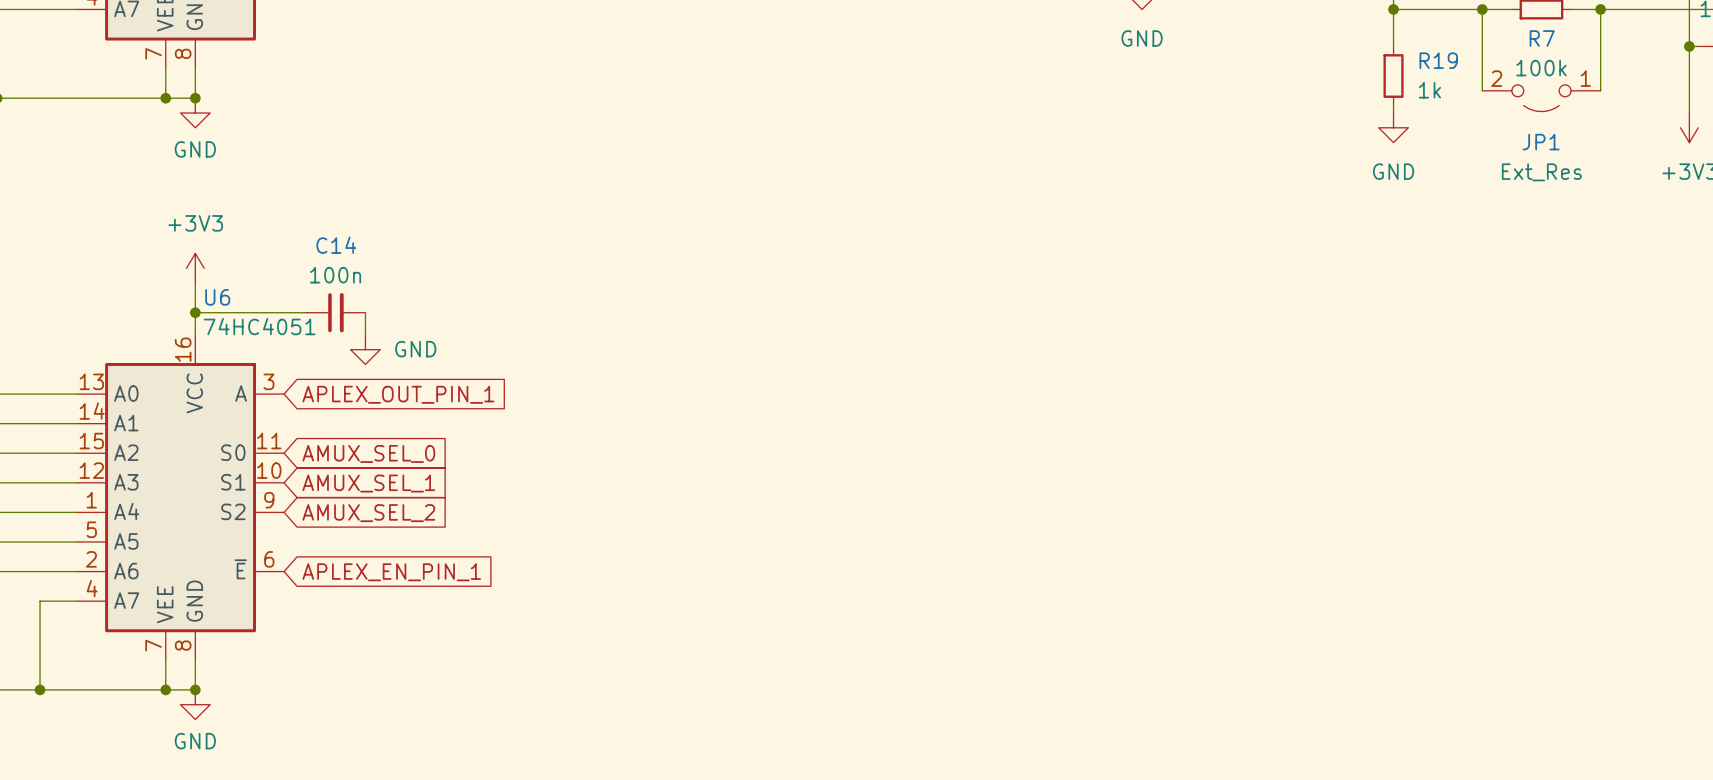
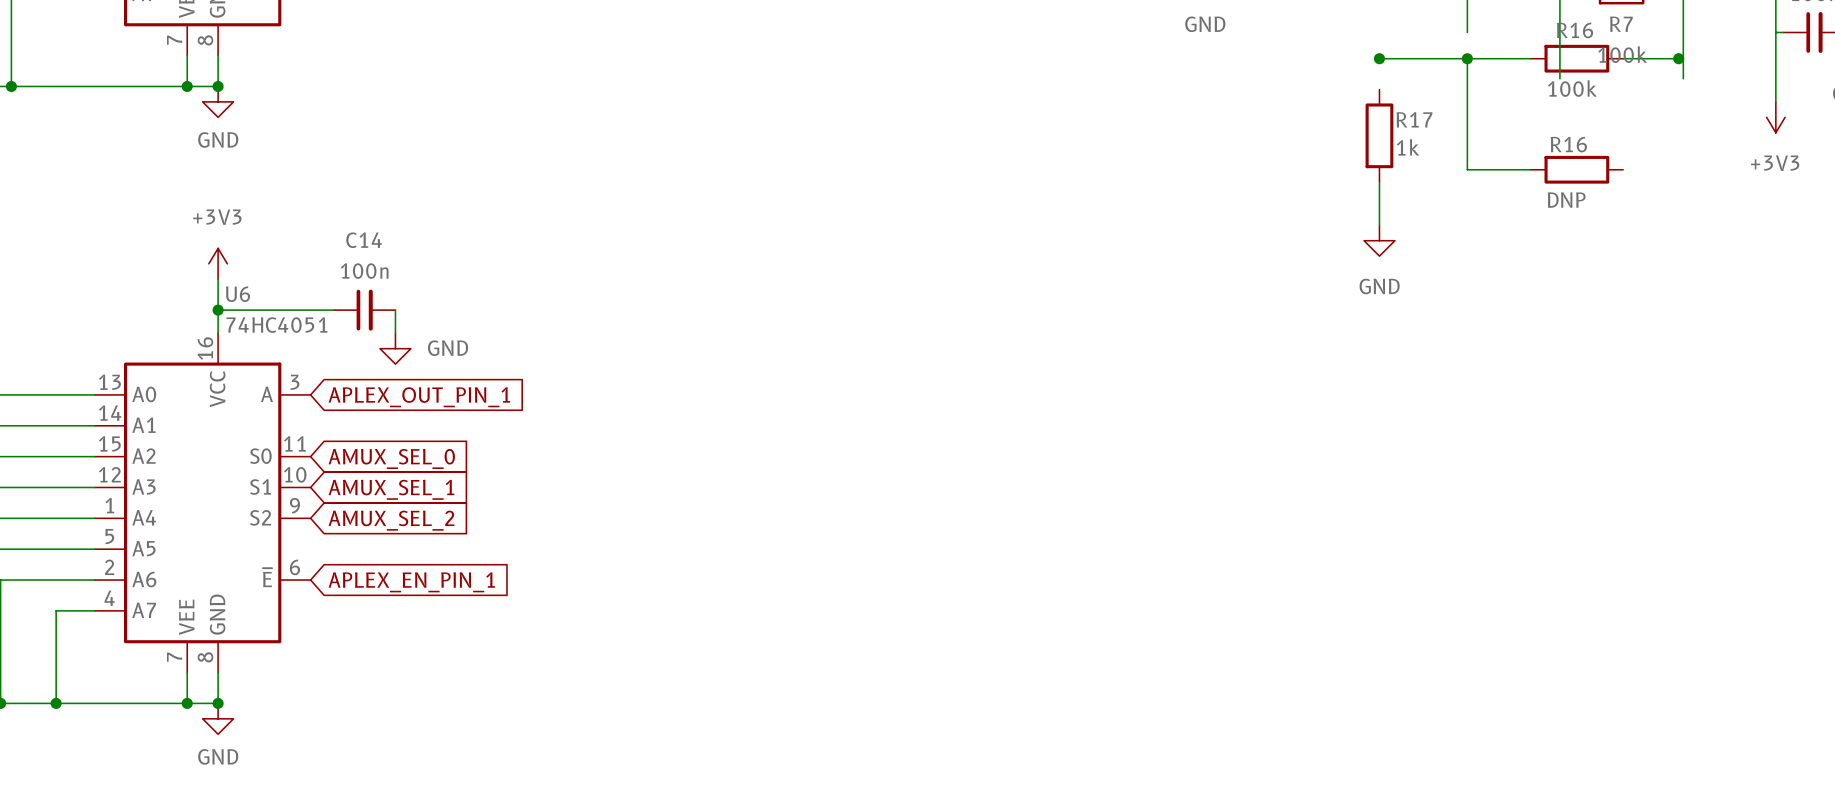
junction: (1689, 46) -> none
wire: none -> (1379, 58) (1530, 58)
junction: none -> (1379, 58)
wire: none -> (1467, 58) (1467, 94)
junction: none -> (1467, 58)
R16: none -> 100k (1576, 58)
wire: none -> (1623, 58) (1678, 58)
junction: none -> (1678, 58)
R19: 1k (1393, 76) -> none
JP1: Ext_Res (1541, 98) -> none
wire: none -> (1467, 101) (1467, 169) (1530, 169)
power symbol position: GND (1393, 127) -> GND (1379, 240)
R17: none -> 1k (1379, 135)
R16: none -> DNP (1576, 169)
wire: none -> (1379, 182) (1379, 225)

